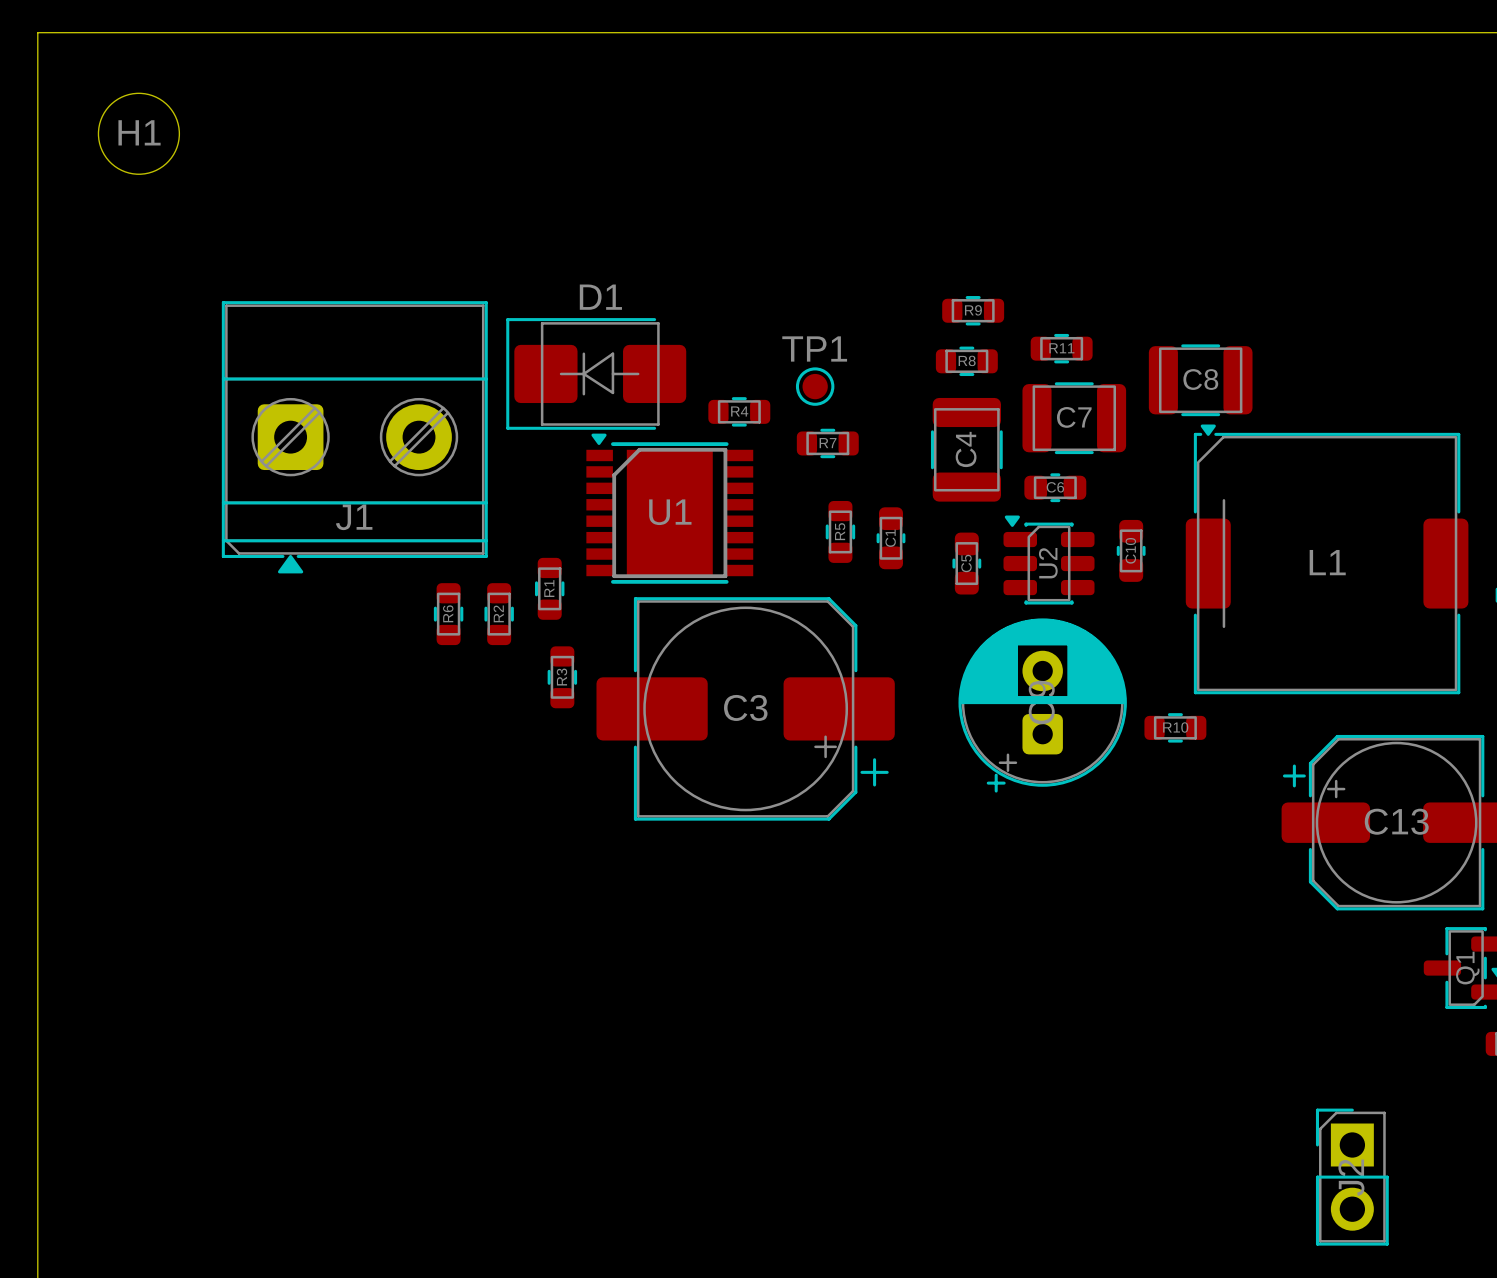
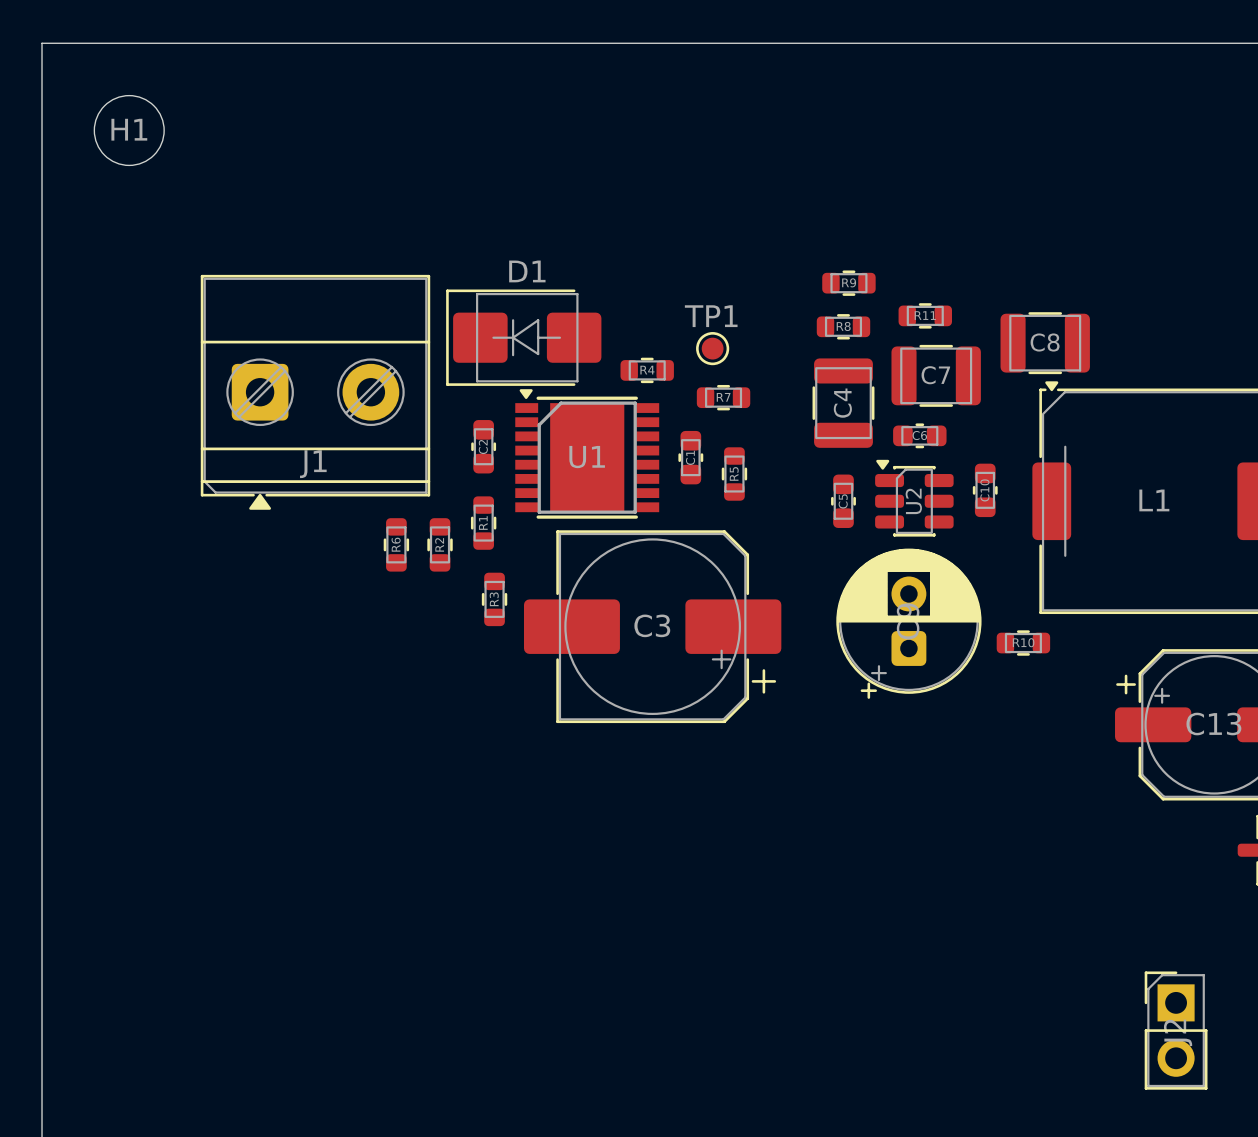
C2: none -> (483, 446)
C1 position: (891, 538) -> (690, 457)

